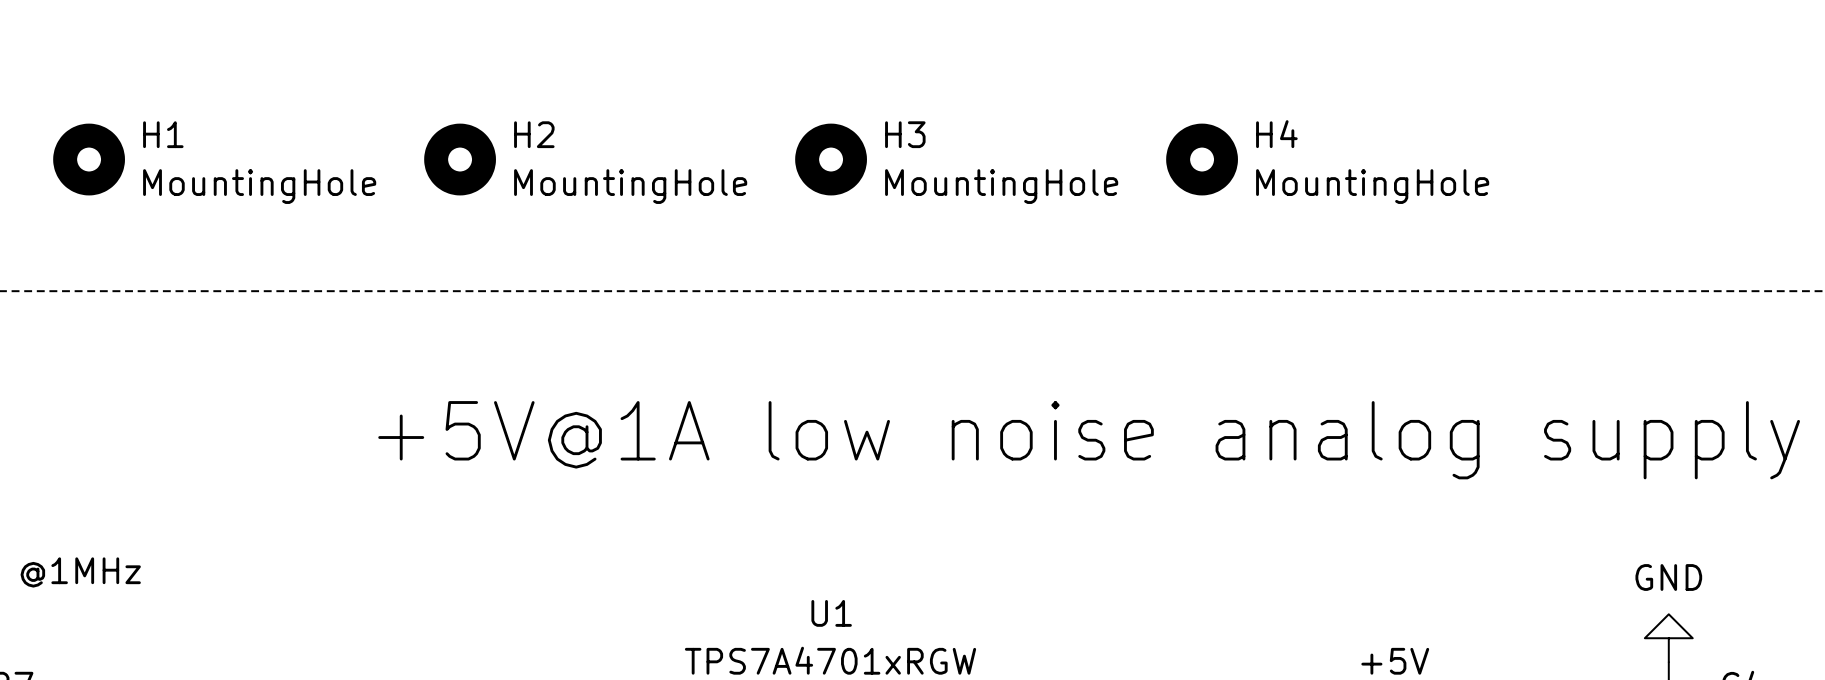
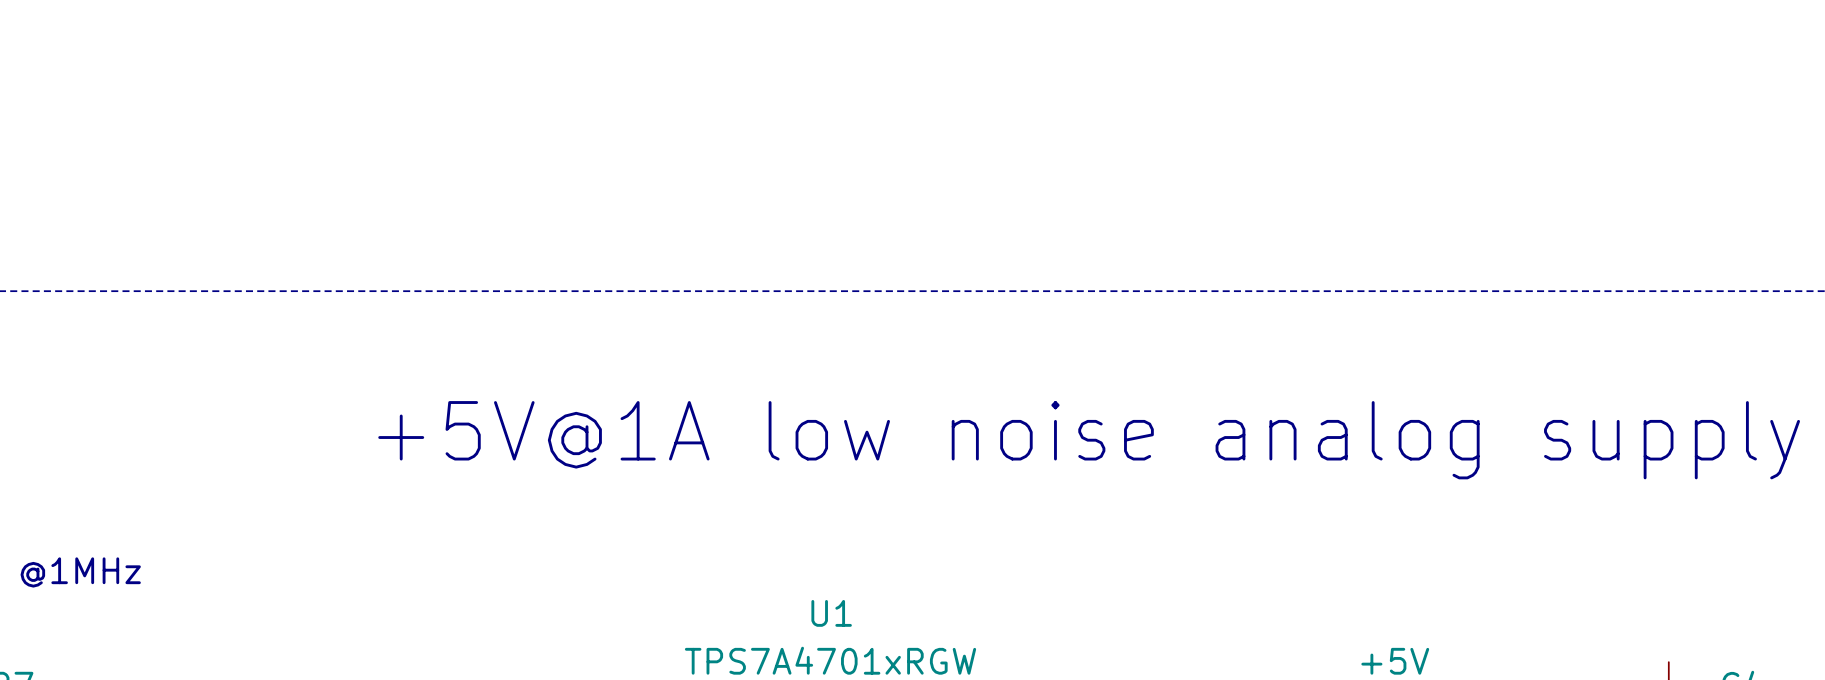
H1: MountingHole (89, 159) -> none
H2: MountingHole (460, 159) -> none
H3: MountingHole (831, 159) -> none
H4: MountingHole (1202, 159) -> none
power symbol: GND (1668, 638) -> none

